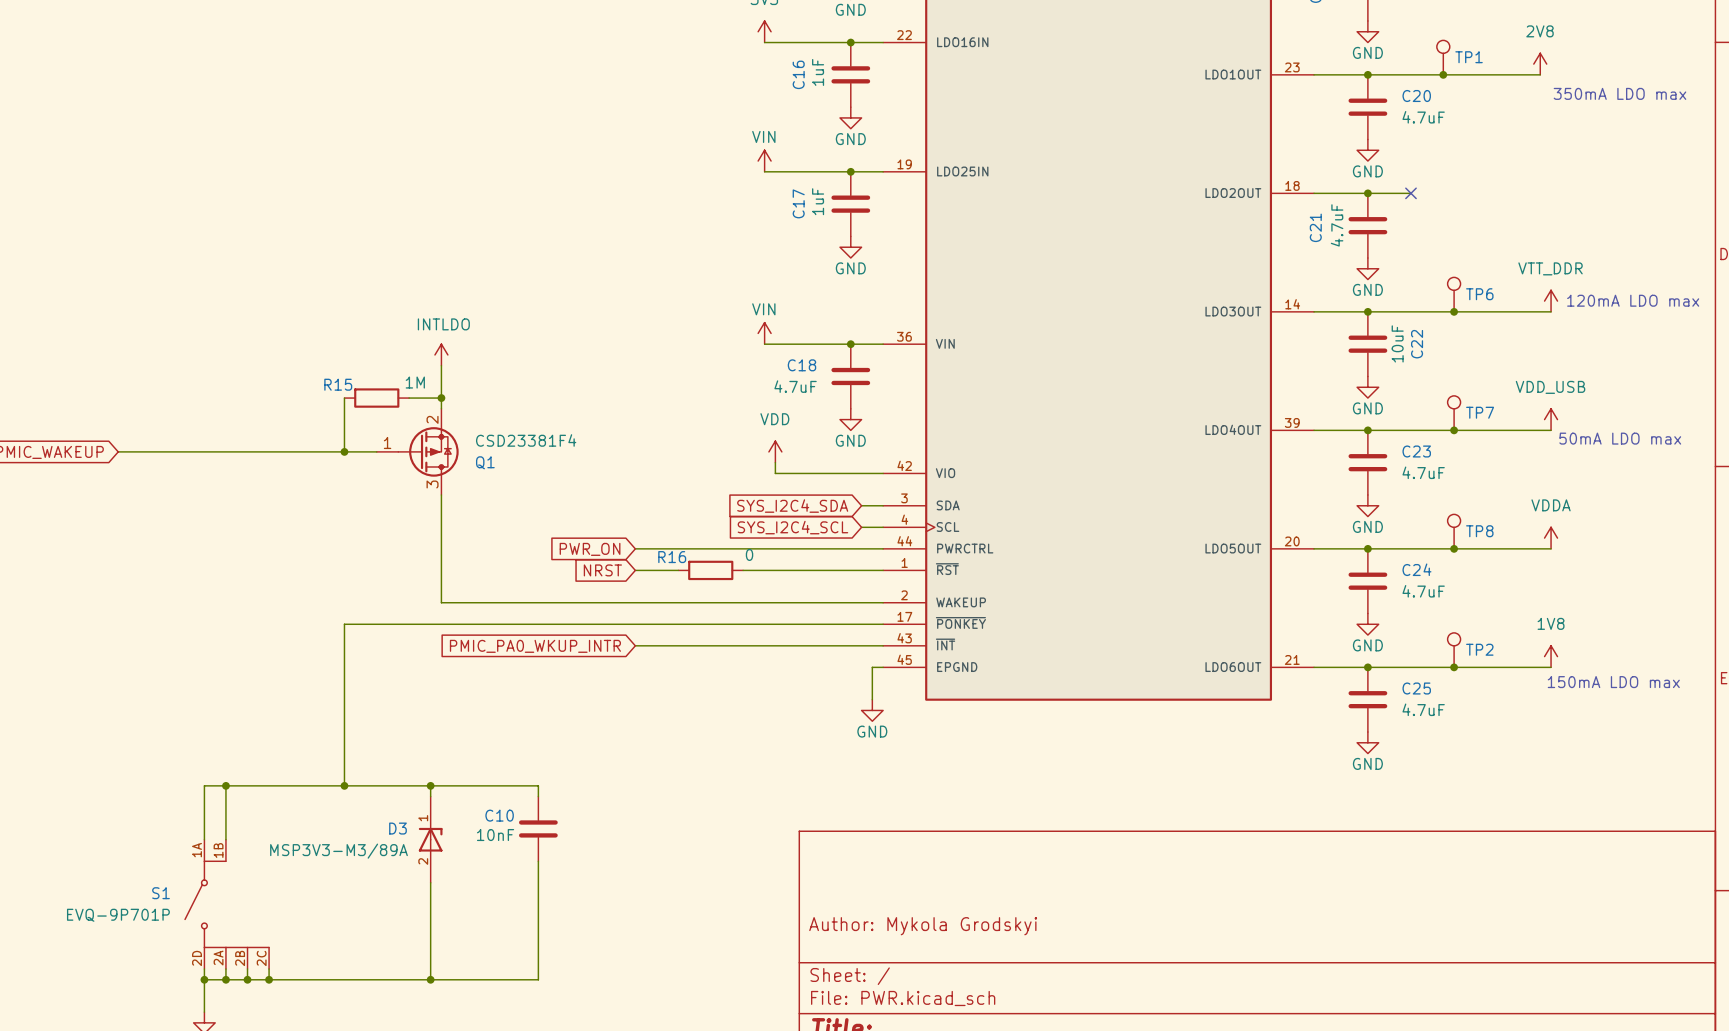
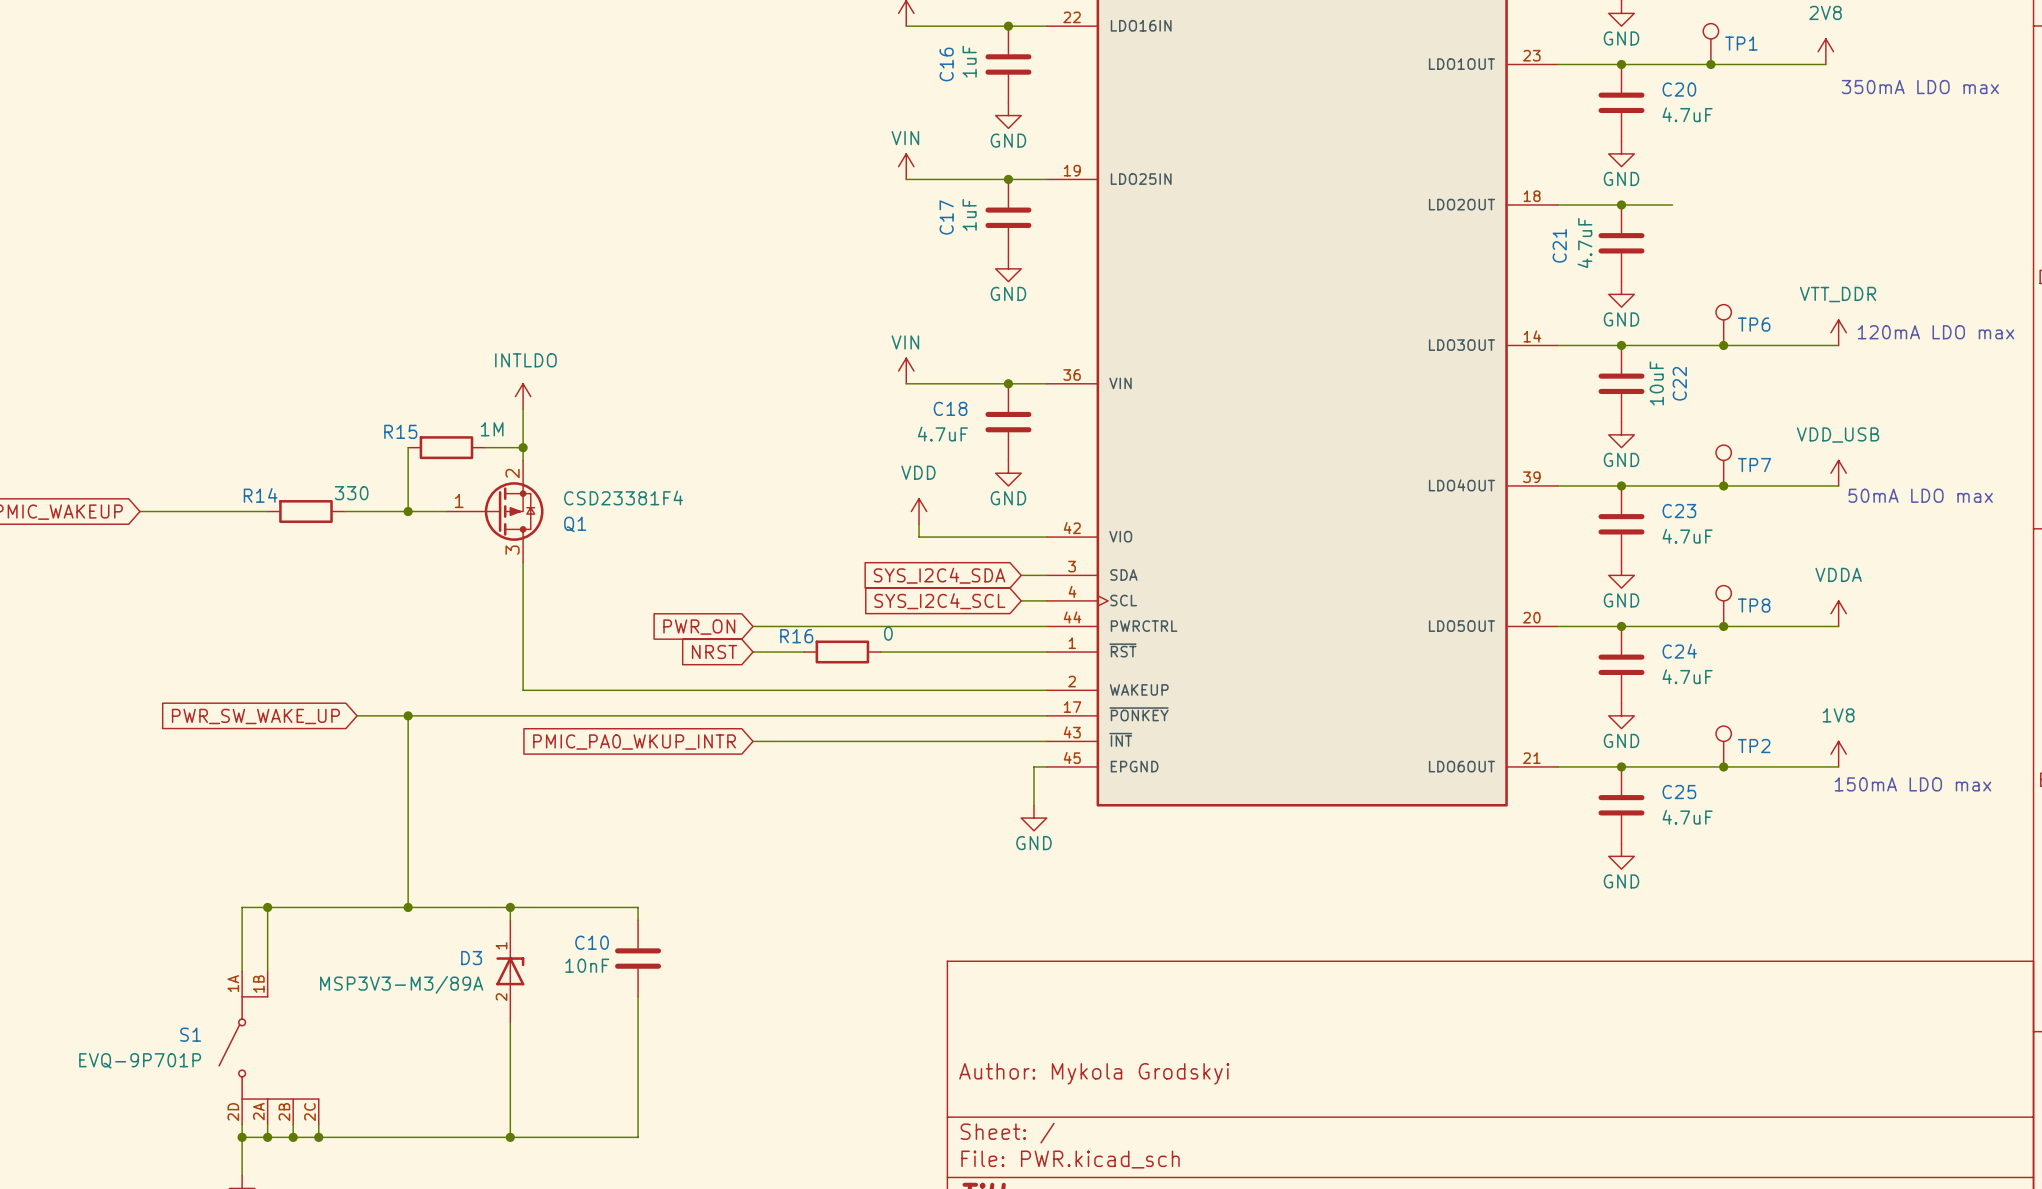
no-connect mark: (1410, 193) -> none
wire: (225, 451) (290, 451) -> none
R14: none -> 330 (305, 511)
global label: none -> PWR_SW_WAKE_UP (255, 716)
wire: none -> (357, 715) (408, 715)
junction: none -> (408, 715)

